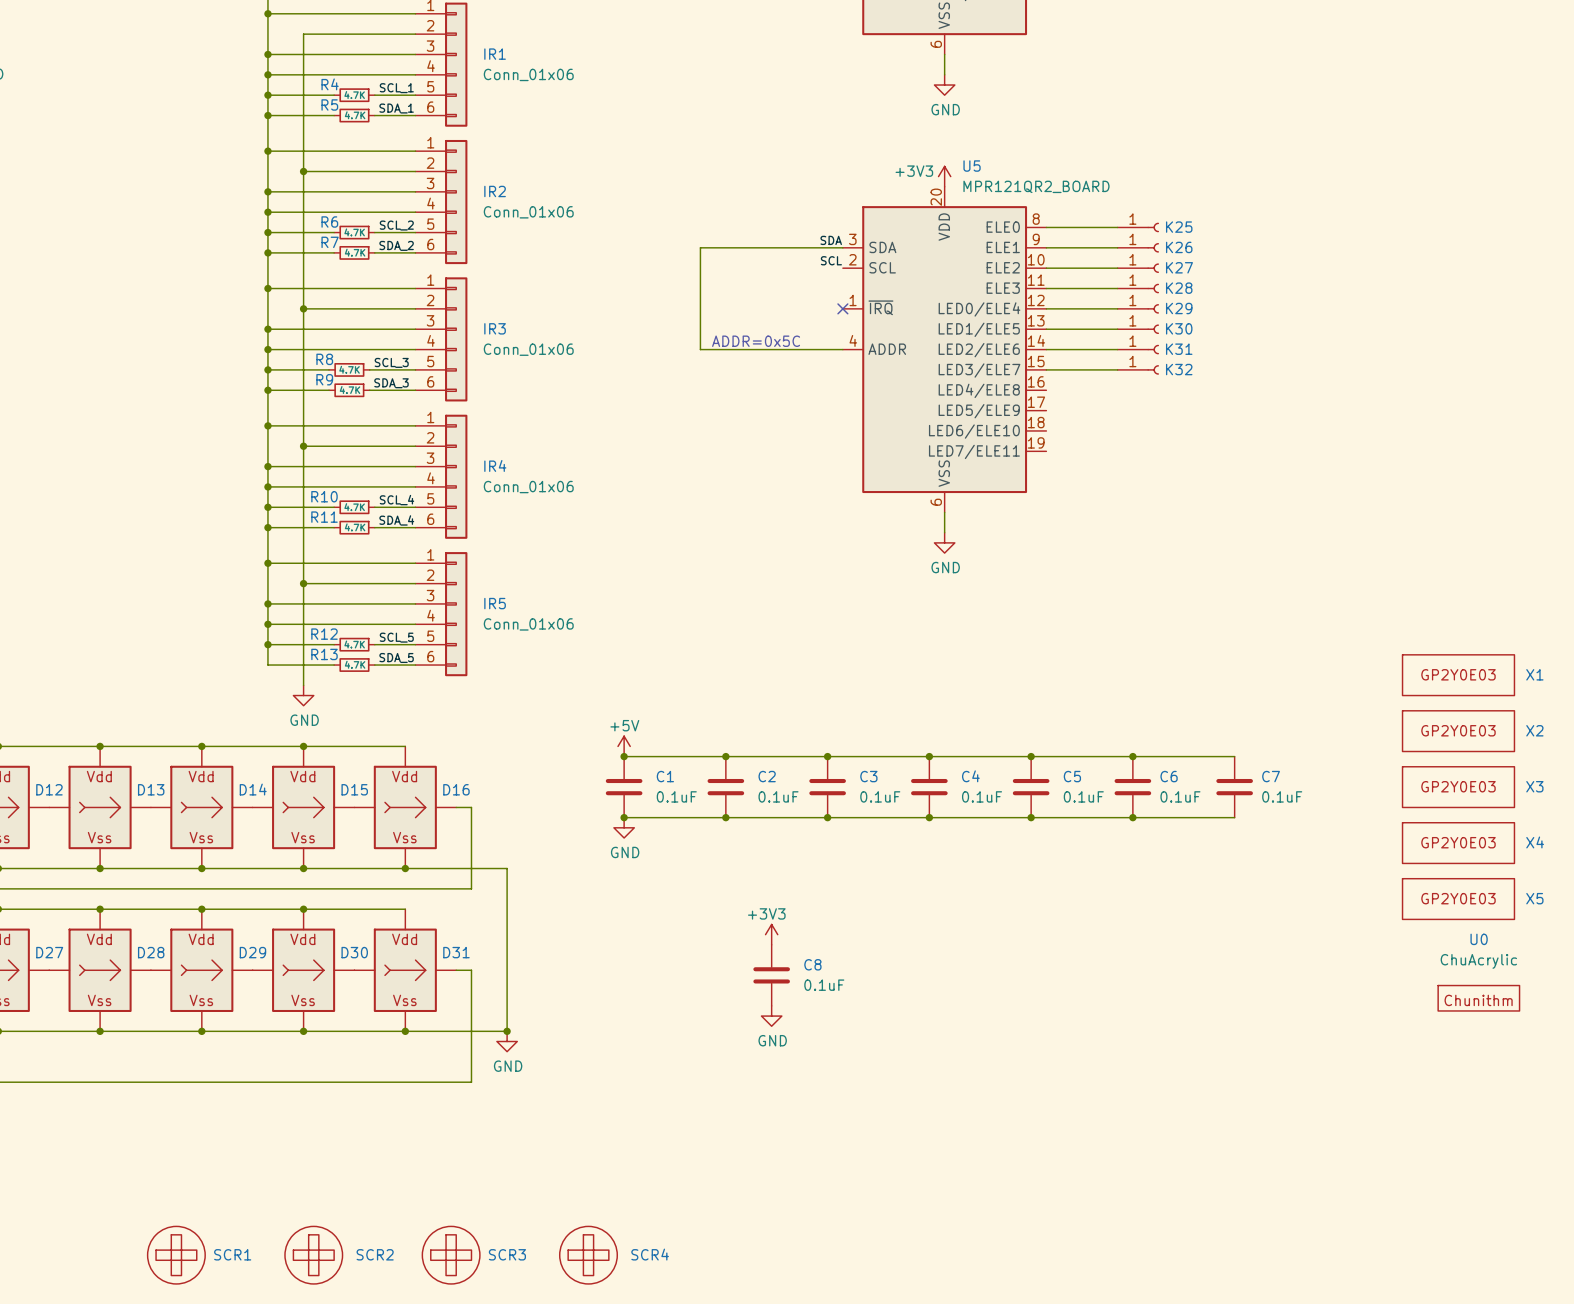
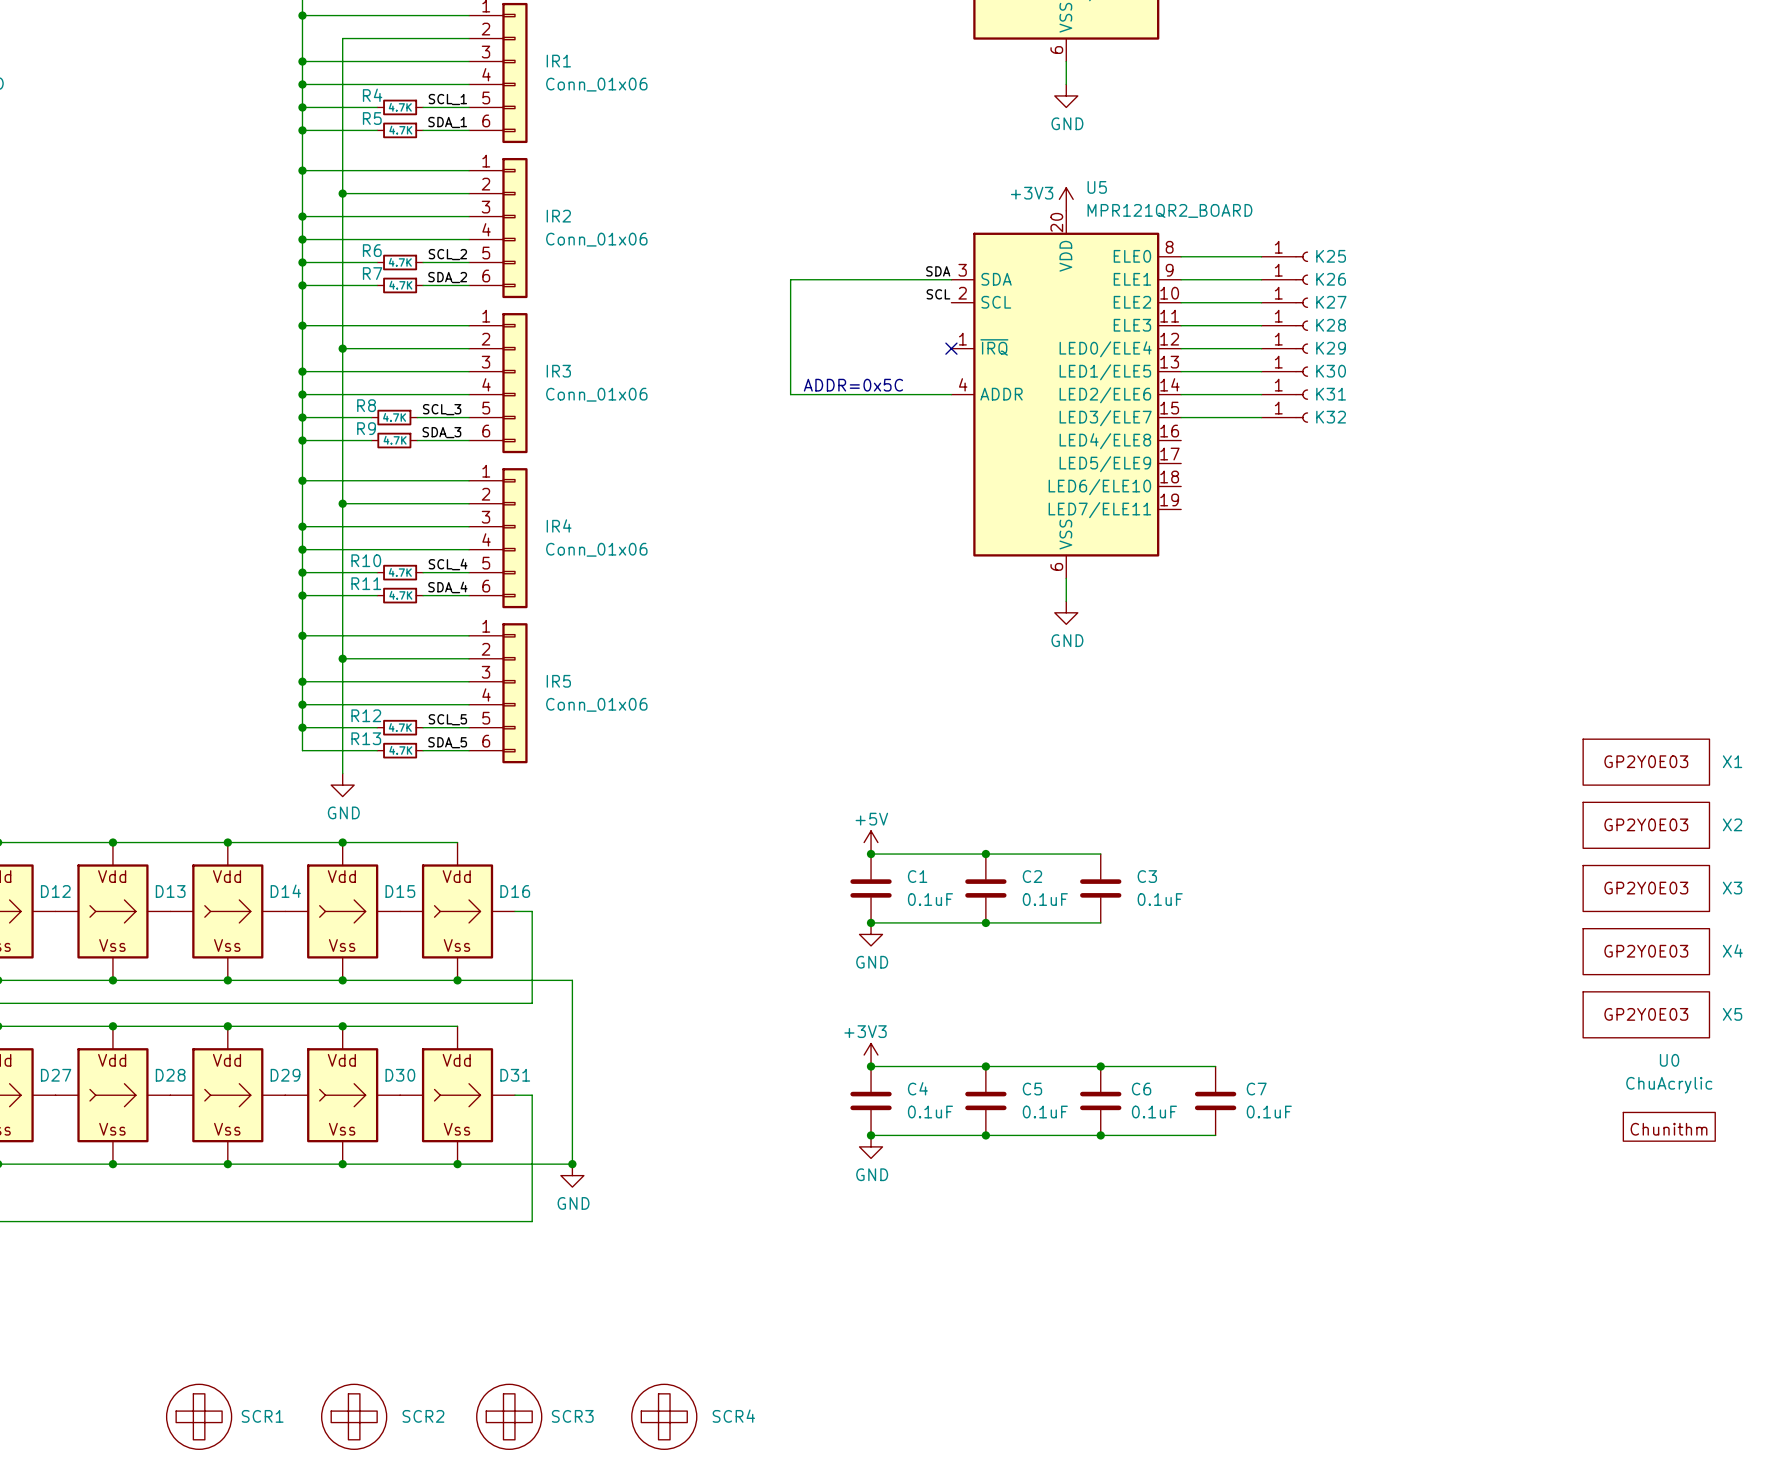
power symbol position: +5V (624, 746) -> +5V (871, 842)
wire: (624, 756) (771, 756) -> none
junction: (624, 756) -> none
junction: (725, 756) -> none
junction: none -> (871, 854)
junction: (827, 756) -> none
junction: none -> (985, 854)
junction: (929, 756) -> none
wire: (975, 756) (1234, 756) -> none
junction: (1031, 756) -> none
junction: (1132, 756) -> none
C1 position: (624, 787) -> (871, 888)
C2 position: (725, 787) -> (985, 888)
C3 position: (827, 787) -> (1100, 888)
C4: 0.1uF (929, 787) -> none
C5 position: (1031, 787) -> (985, 1100)
C6 position: (1132, 787) -> (1100, 1100)
C7 position: (1234, 787) -> (1215, 1100)
wire: (624, 817) (771, 817) -> none
junction: (624, 817) -> none
junction: (725, 817) -> none
junction: none -> (871, 922)
junction: (827, 817) -> none
junction: none -> (985, 922)
junction: (929, 817) -> none
wire: (975, 817) (1234, 817) -> none
junction: (1031, 817) -> none
junction: (1132, 817) -> none
power symbol position: GND (624, 827) -> GND (871, 934)
wire: none -> (871, 1066) (1215, 1066)
junction: none -> (871, 1066)
junction: none -> (985, 1066)
junction: none -> (1100, 1066)
C8 name: C8 (812, 964) -> C4 (917, 1088)
wire: none -> (871, 1135) (1215, 1135)
junction: none -> (871, 1135)
junction: none -> (985, 1135)
junction: none -> (1100, 1135)

